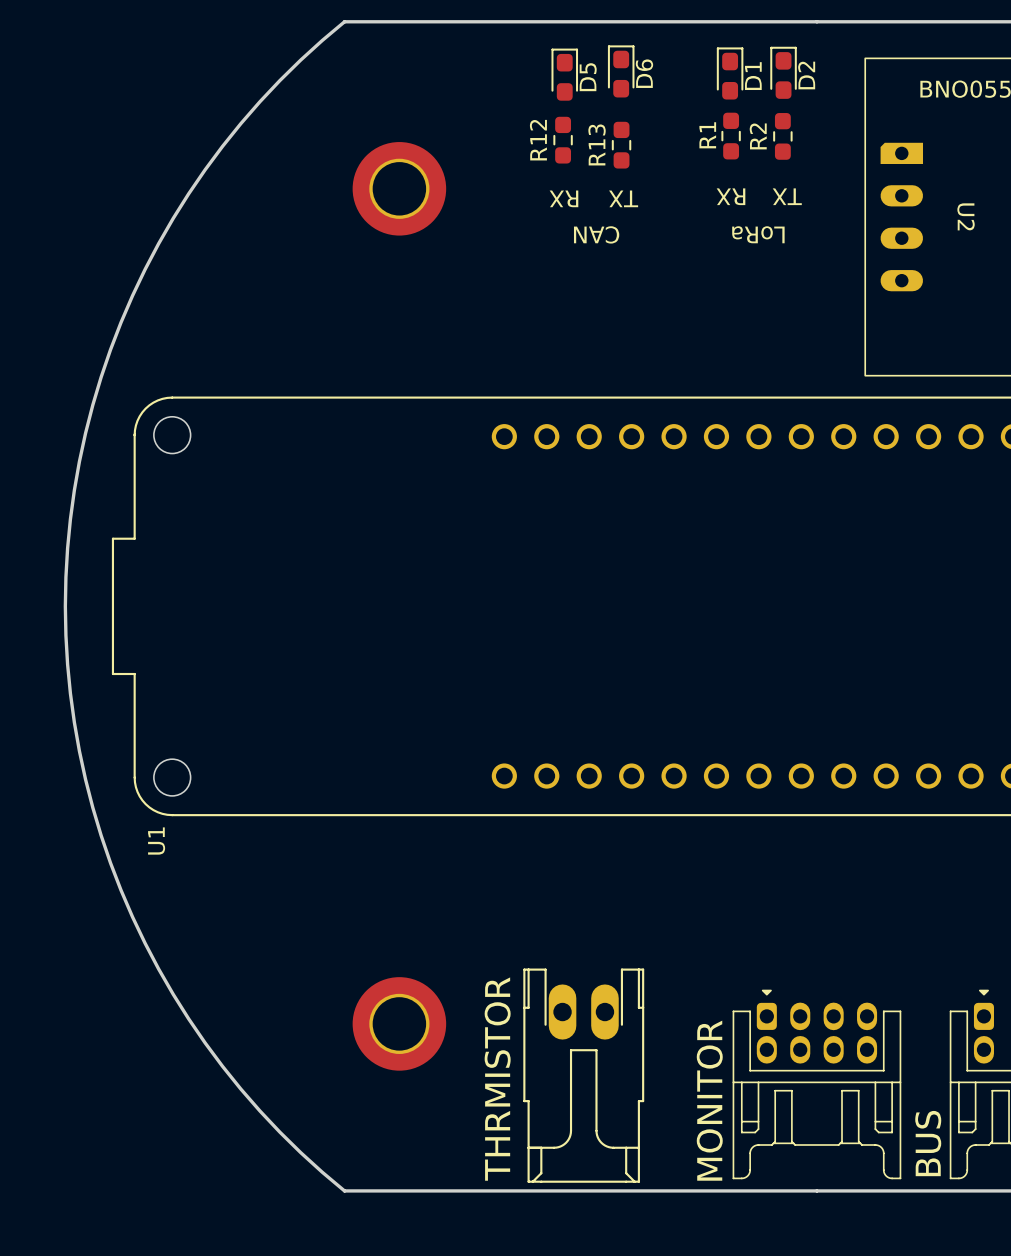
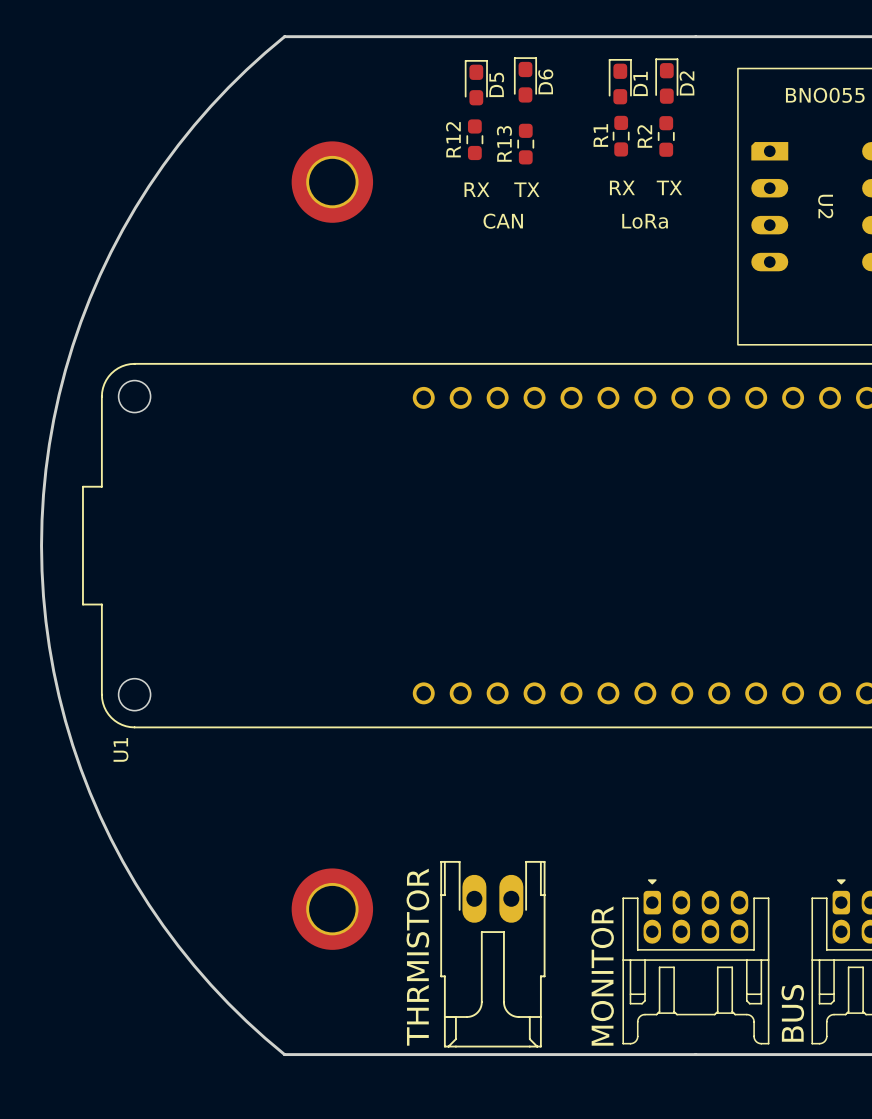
text rotation: 0° (731, 196) -> 180° (622, 187)
text rotation: 0° (787, 196) -> 180° (669, 187)
text rotation: 0° (563, 198) -> 180° (476, 189)
text rotation: 0° (623, 198) -> 180° (526, 189)
text rotation: 0° (596, 234) -> 180° (503, 221)
text rotation: 0° (758, 234) -> 180° (645, 221)

